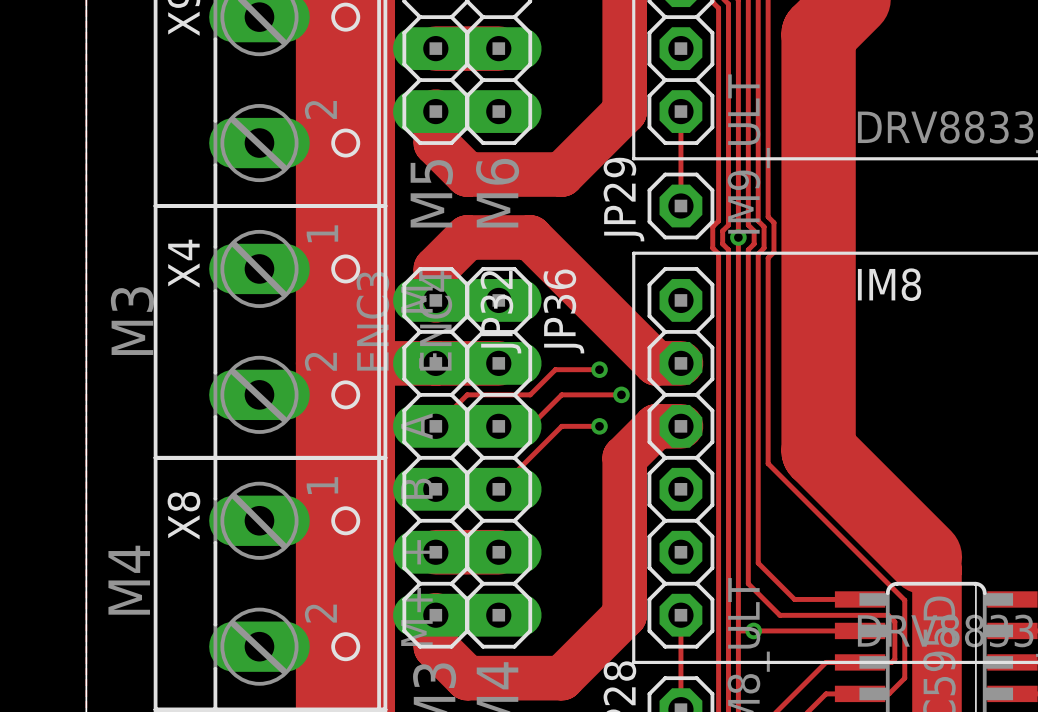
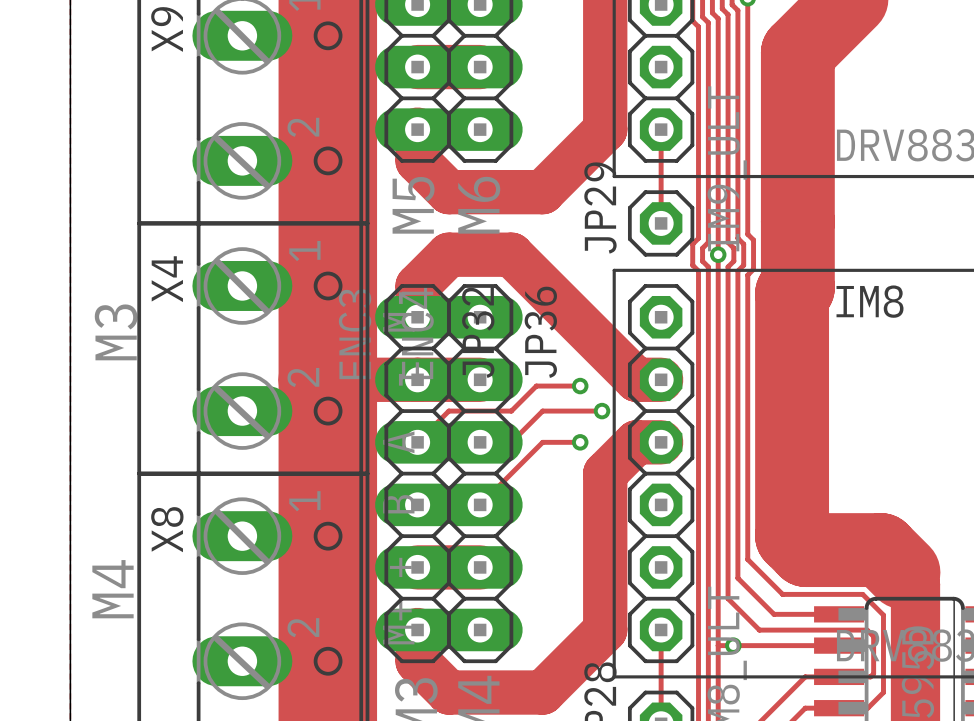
track: (818, 270) (818, 451) (902, 534) -> (797, 287) (792, 293) (792, 536) (805, 550) (881, 550)
track: (768, 463) (883, 579) -> (747, 479) (747, 559) (782, 594) (862, 594)

